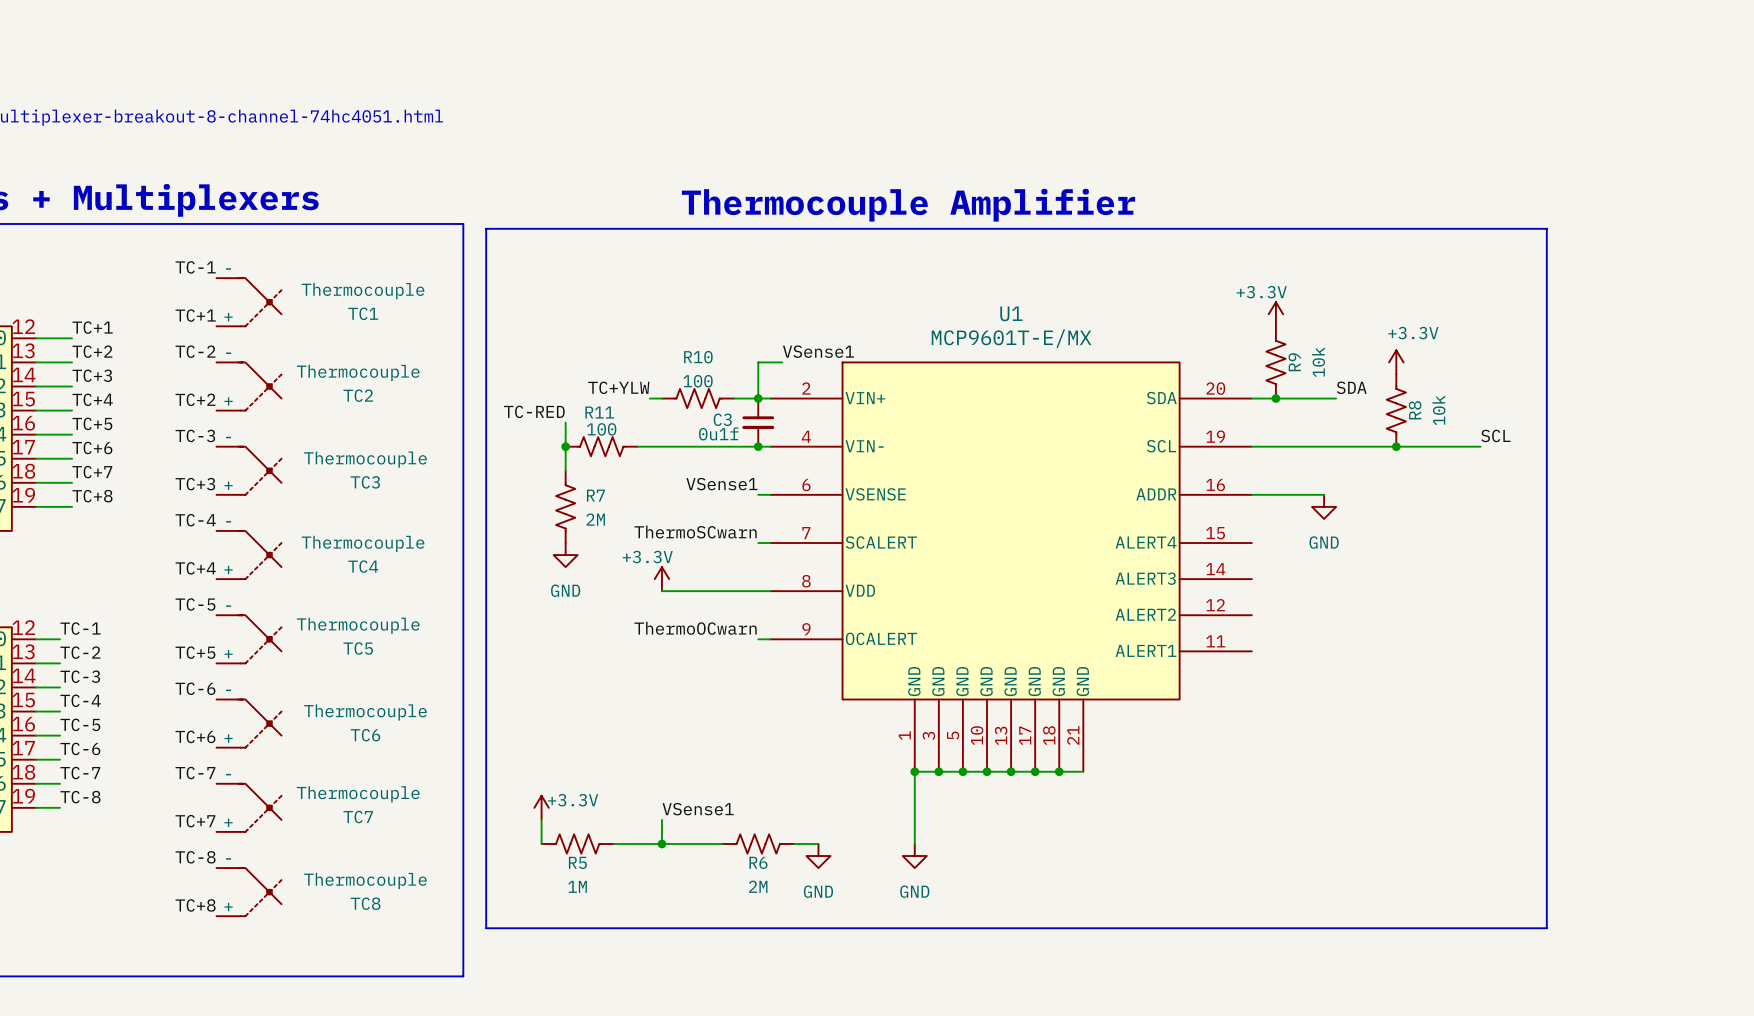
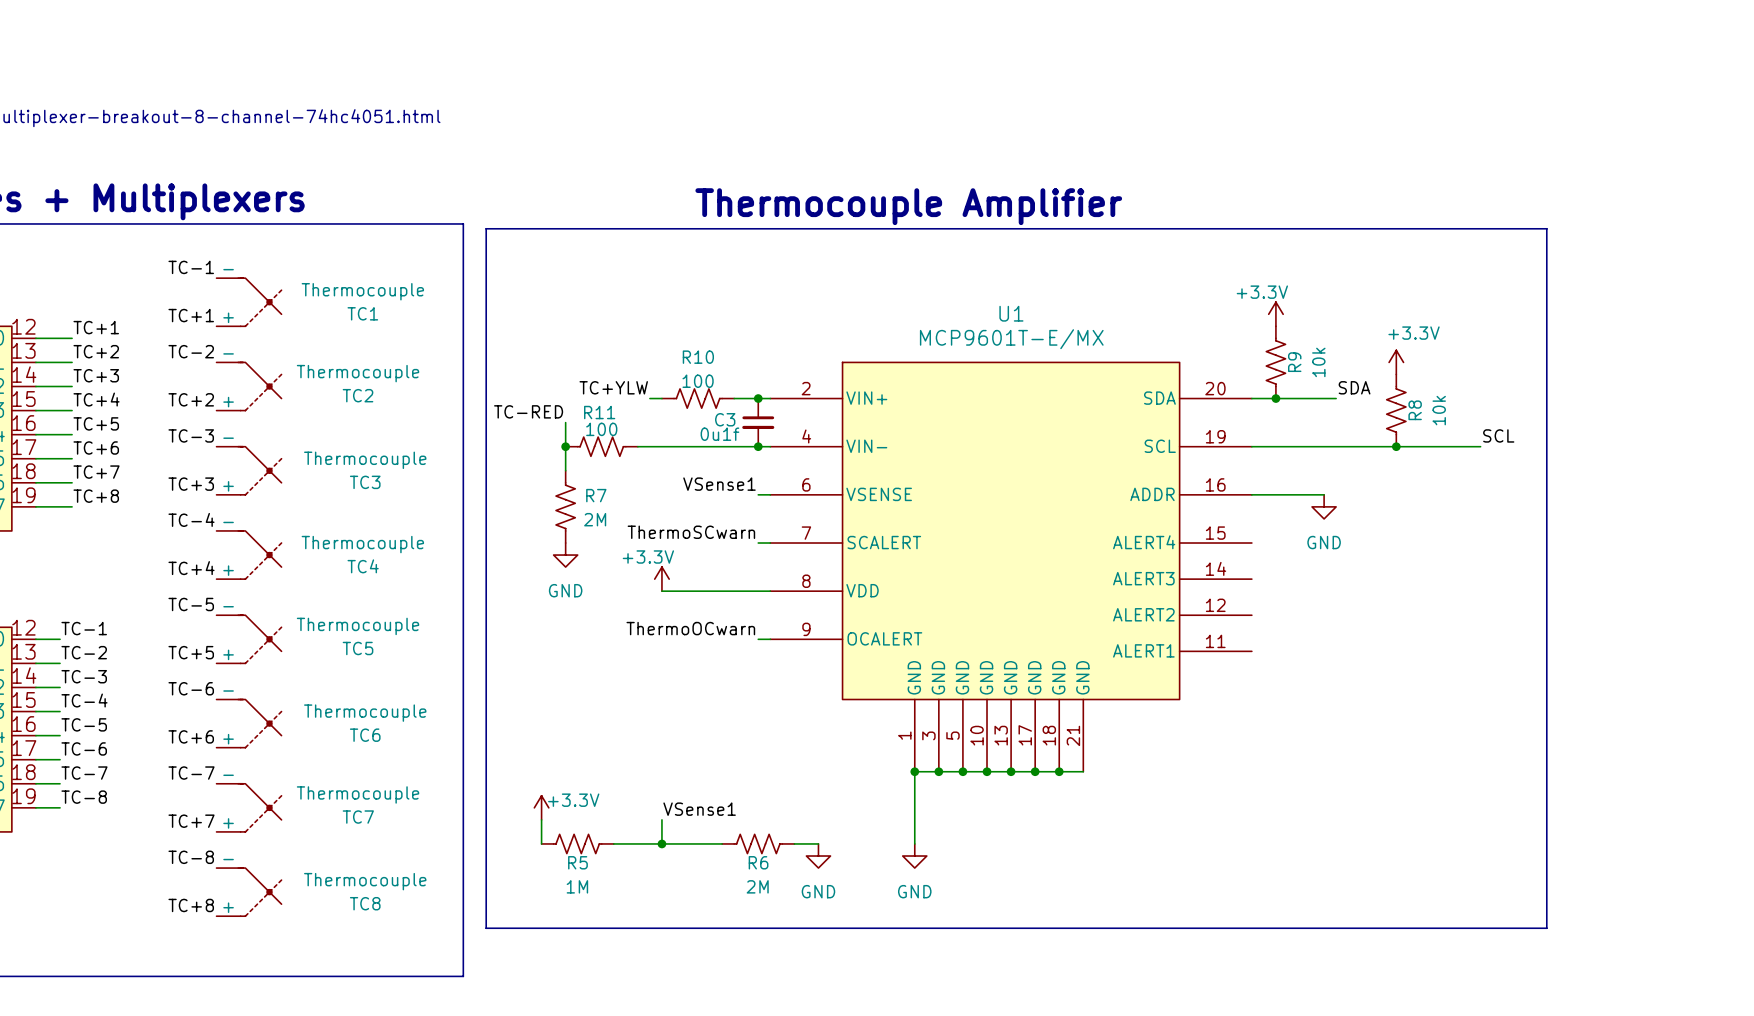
label: VSense1 (818, 351) -> none
wire: (782, 362) (758, 362) (758, 398) -> none

